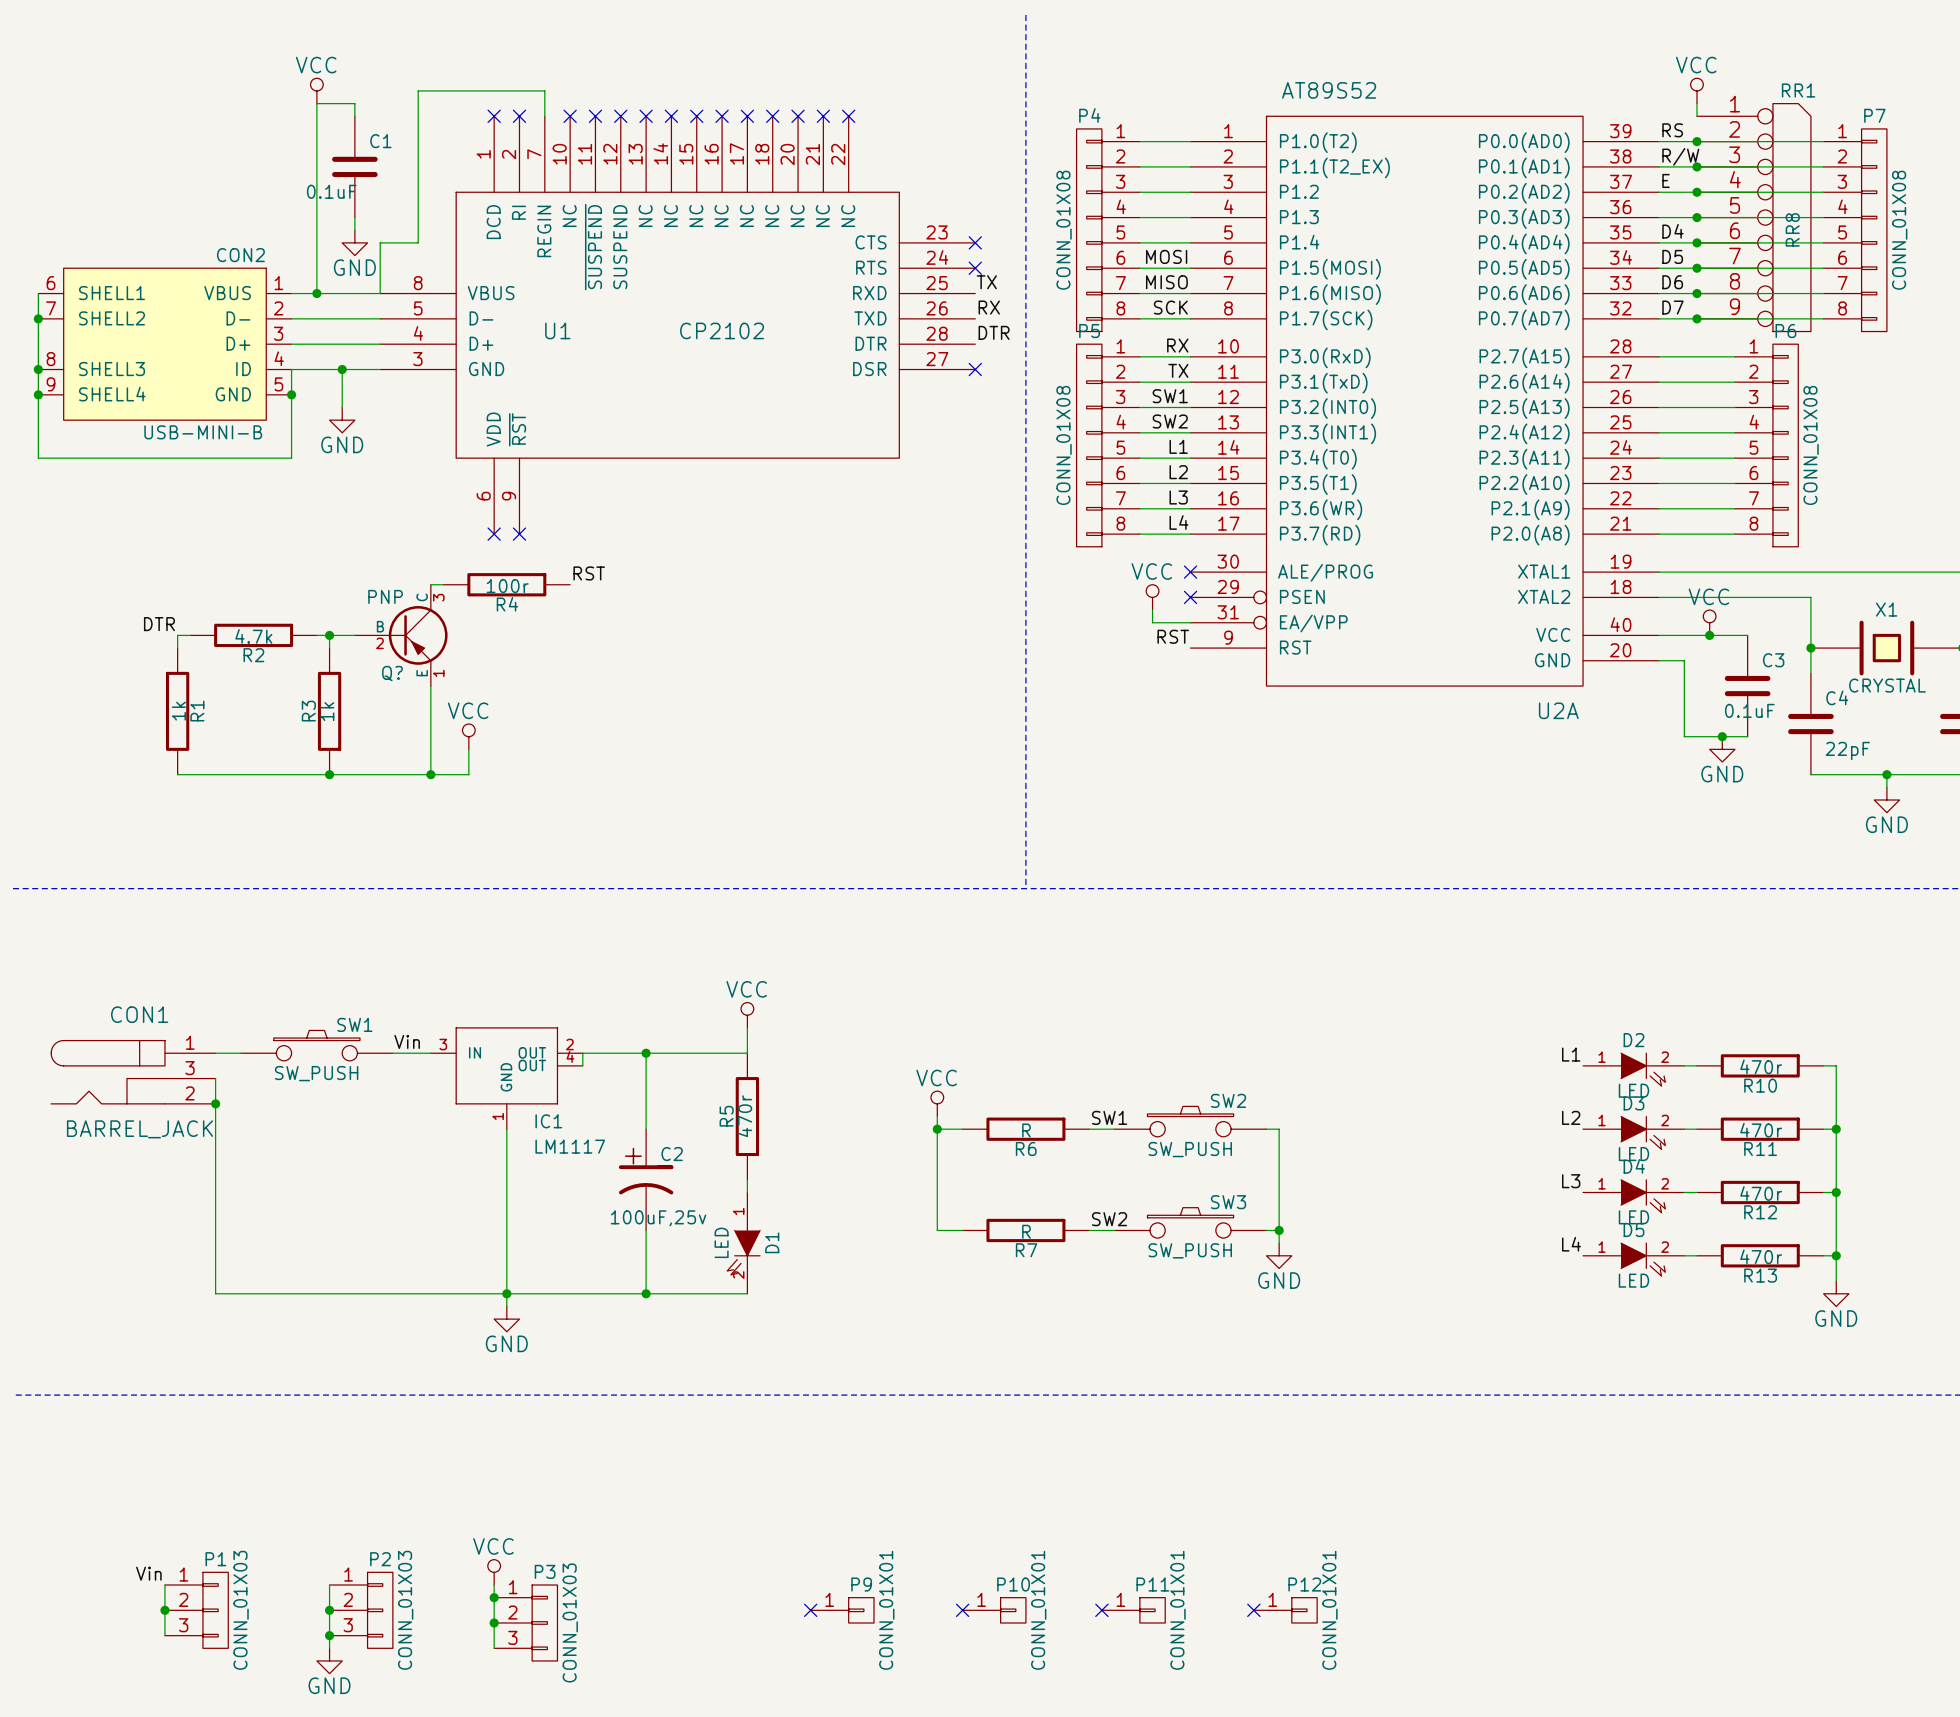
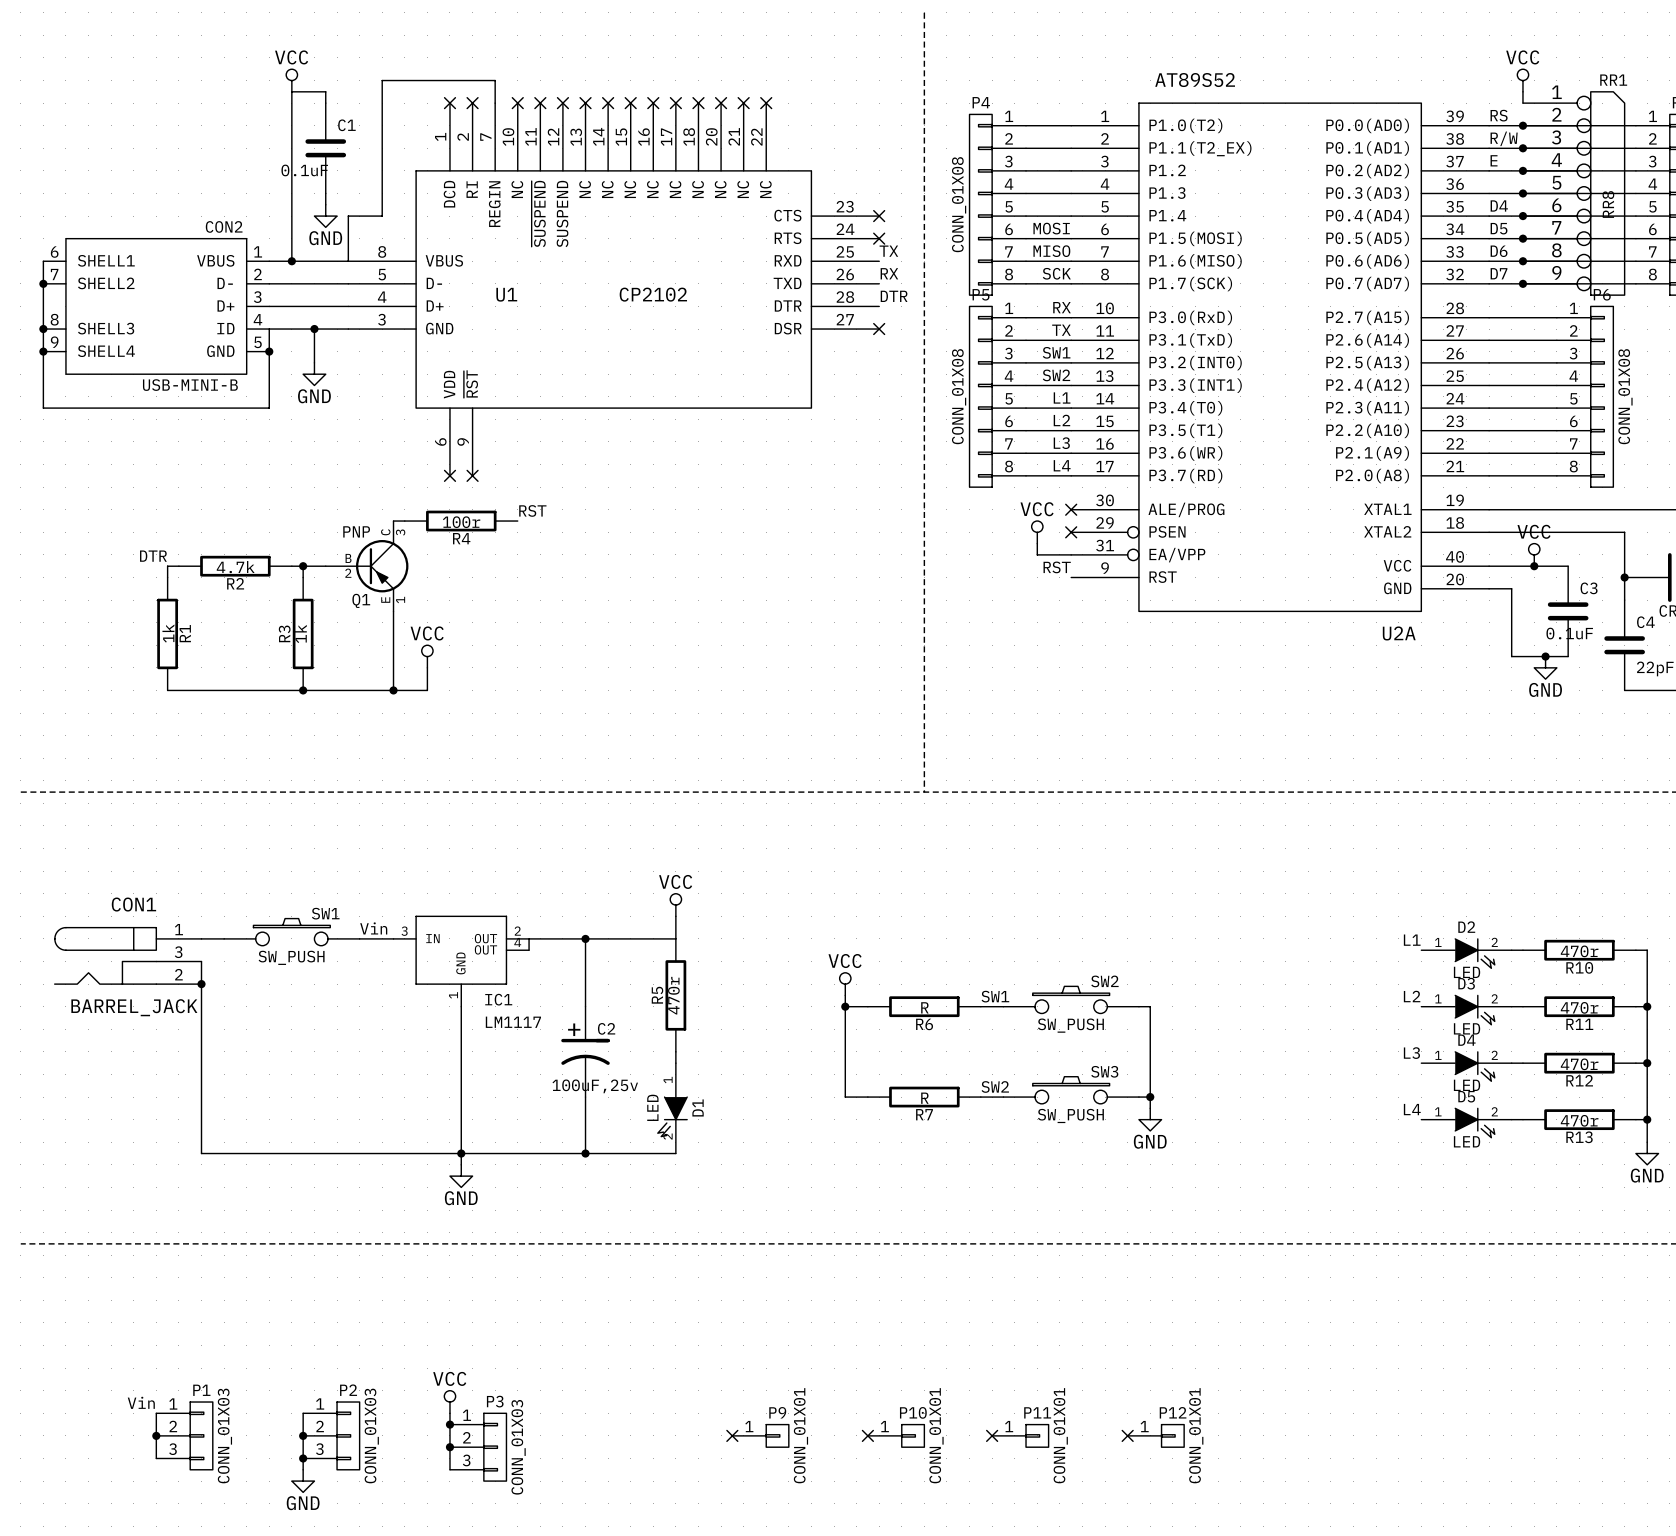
Q? name: Q? (392, 673) -> Q1 (361, 600)

